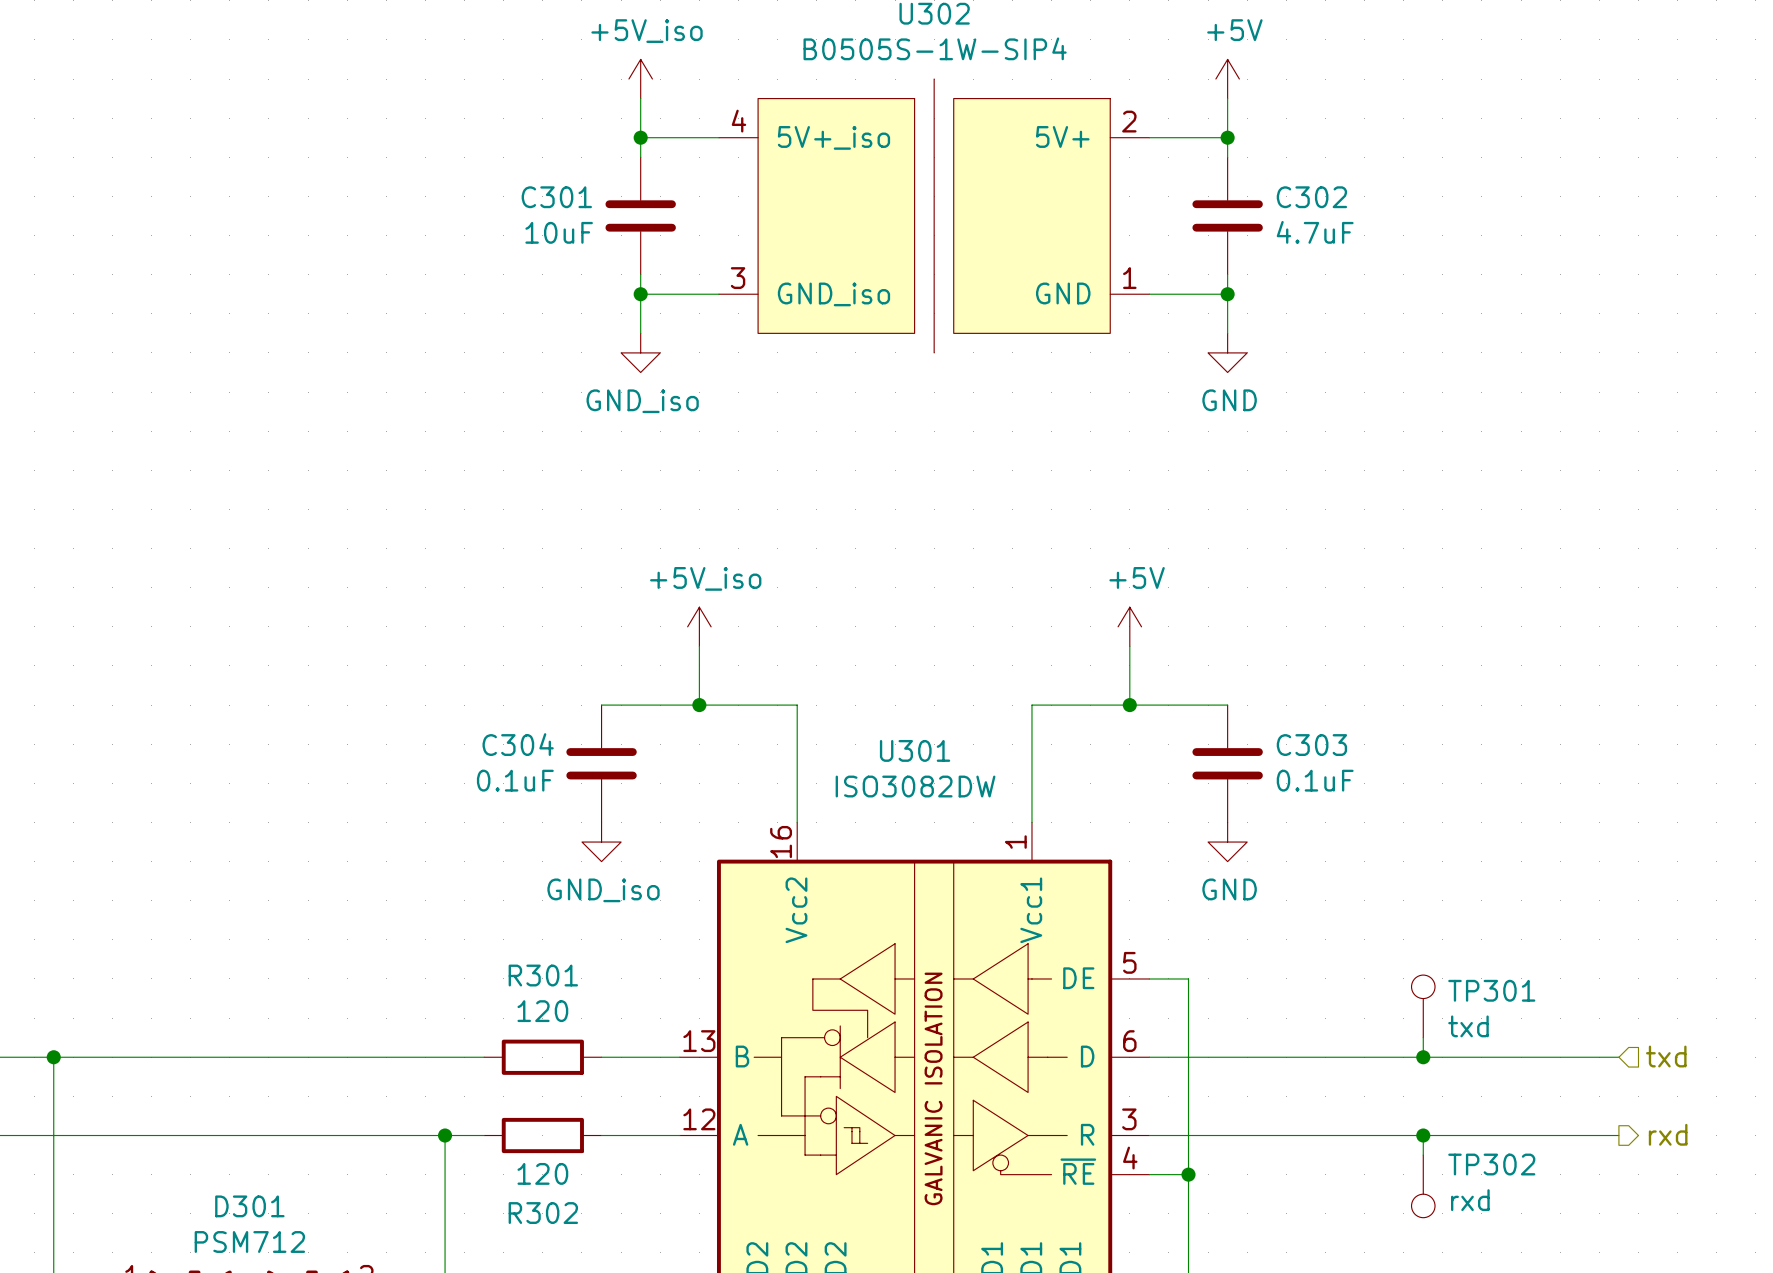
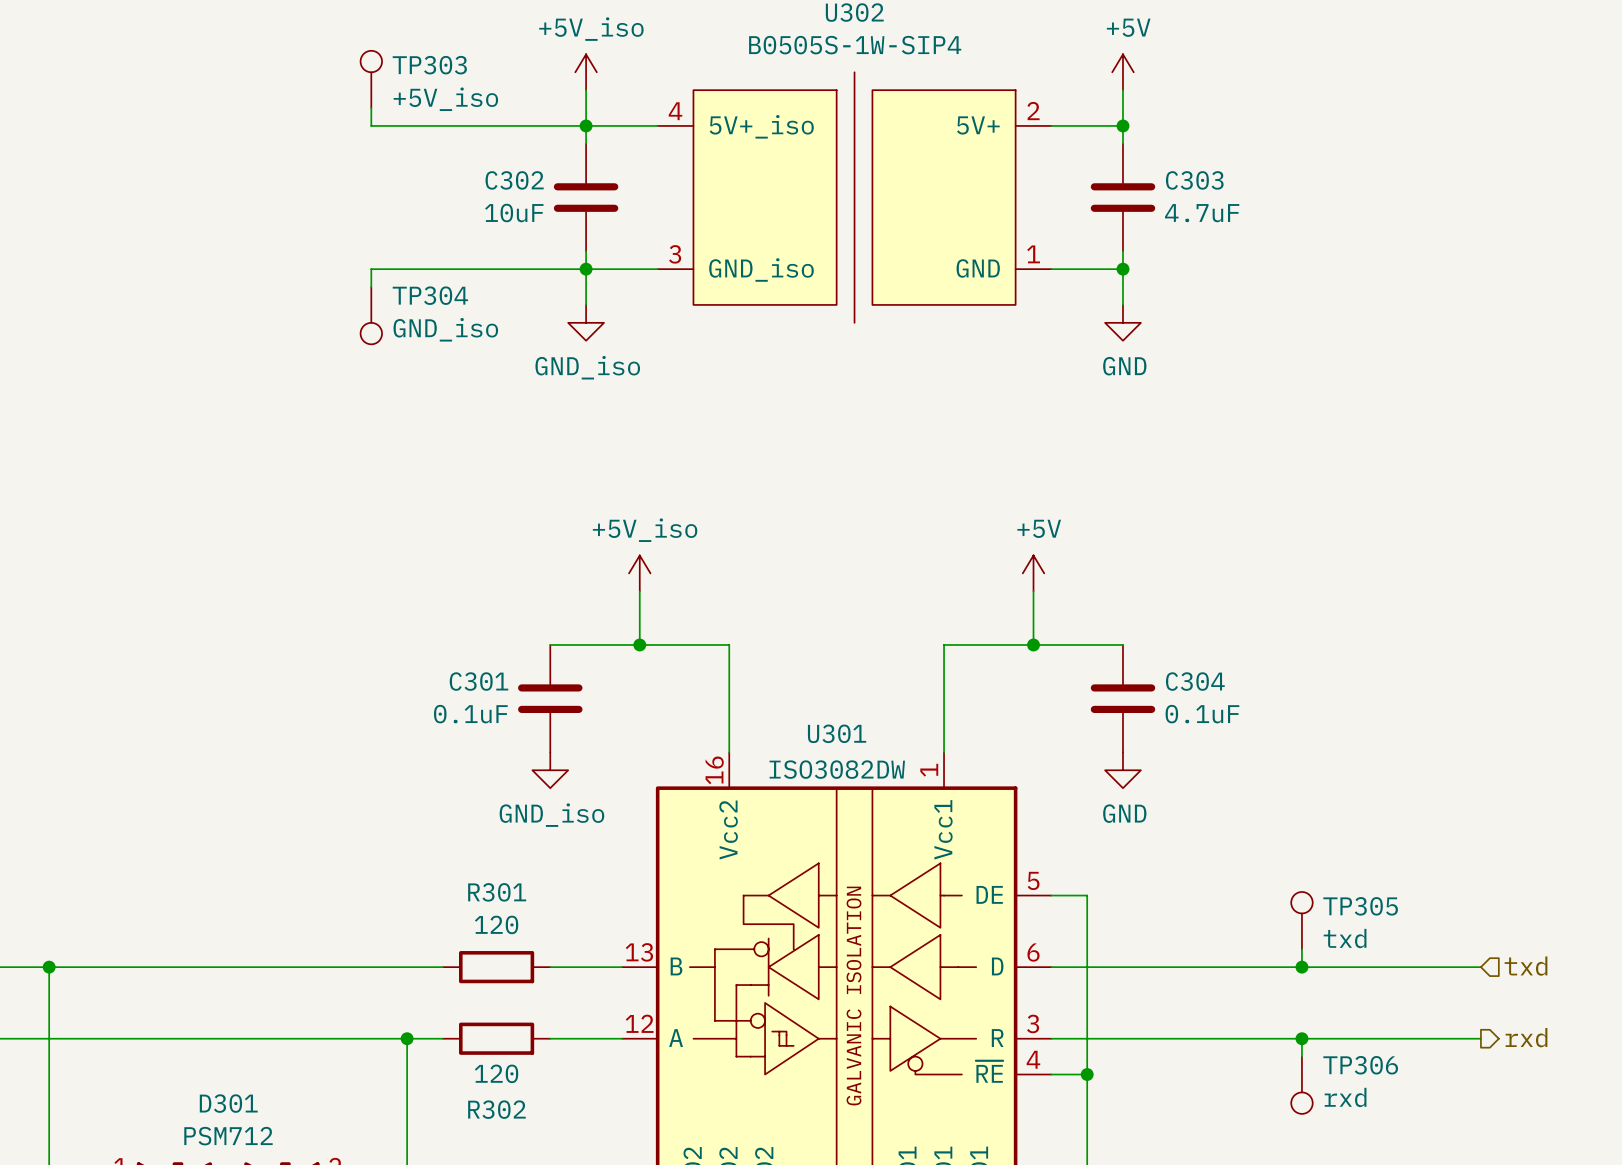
TP303: none -> +5V_iso (371, 79)
wire: none -> (371, 108) (371, 125) (586, 125)
C301 name: C301 (556, 197) -> C302 (514, 180)
C302 name: C302 (1311, 197) -> C303 (1194, 180)
wire: none -> (586, 269) (371, 269) (371, 287)
TP304: none -> GND_iso (371, 315)
C304 name: C304 (518, 744) -> C301 (479, 681)
C303 name: C303 (1311, 745) -> C304 (1195, 681)
U301 name position: U301 (915, 750) -> U301 (837, 733)
U301 value position: ISO3082DW (915, 786) -> ISO3082DW (837, 769)
TP301 name: TP301 (1491, 990) -> TP305 (1360, 906)
TP302 name: TP302 (1491, 1164) -> TP306 (1360, 1065)

